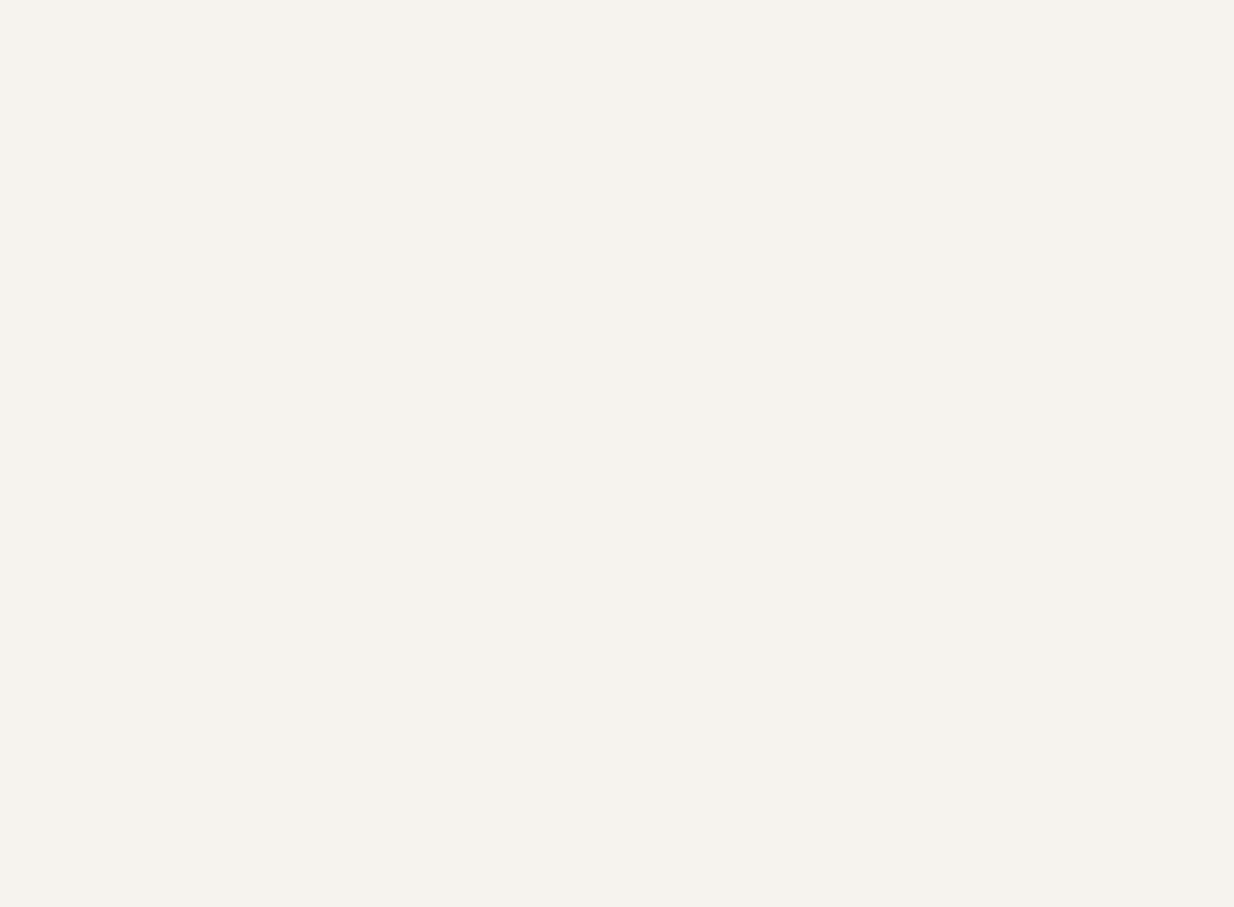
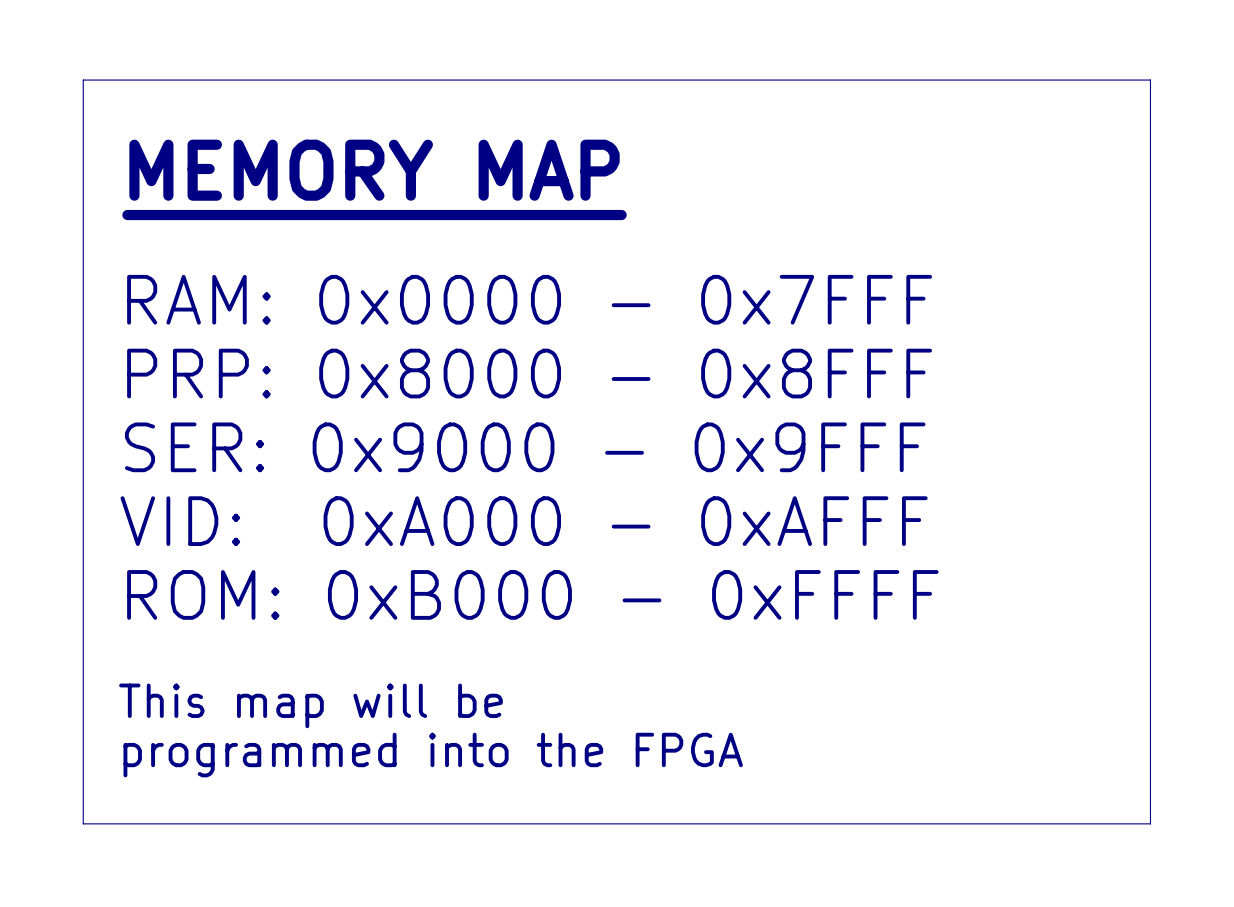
line: none -> (83, 80) (83, 823) (1150, 823) (1150, 80) (83, 80)
text: none -> MEMORY MAP (374, 170)
text: none -> ~{ } (374, 215)
text: none -> RAM: 0x0000 - 0x7FFF (529, 299)
text: none -> PRP: 0x8000 - 0x8FFF (529, 373)
text: none -> SER: 0x9000 - 0x9FFF (525, 447)
text: none -> VID: 0xA000 - 0xAFFF (524, 521)
text: none -> ROM: 0xB000 - 0xFFFF (532, 594)
text: none -> This map will be (310, 705)
text: none -> programmed into the FPGA (433, 755)

